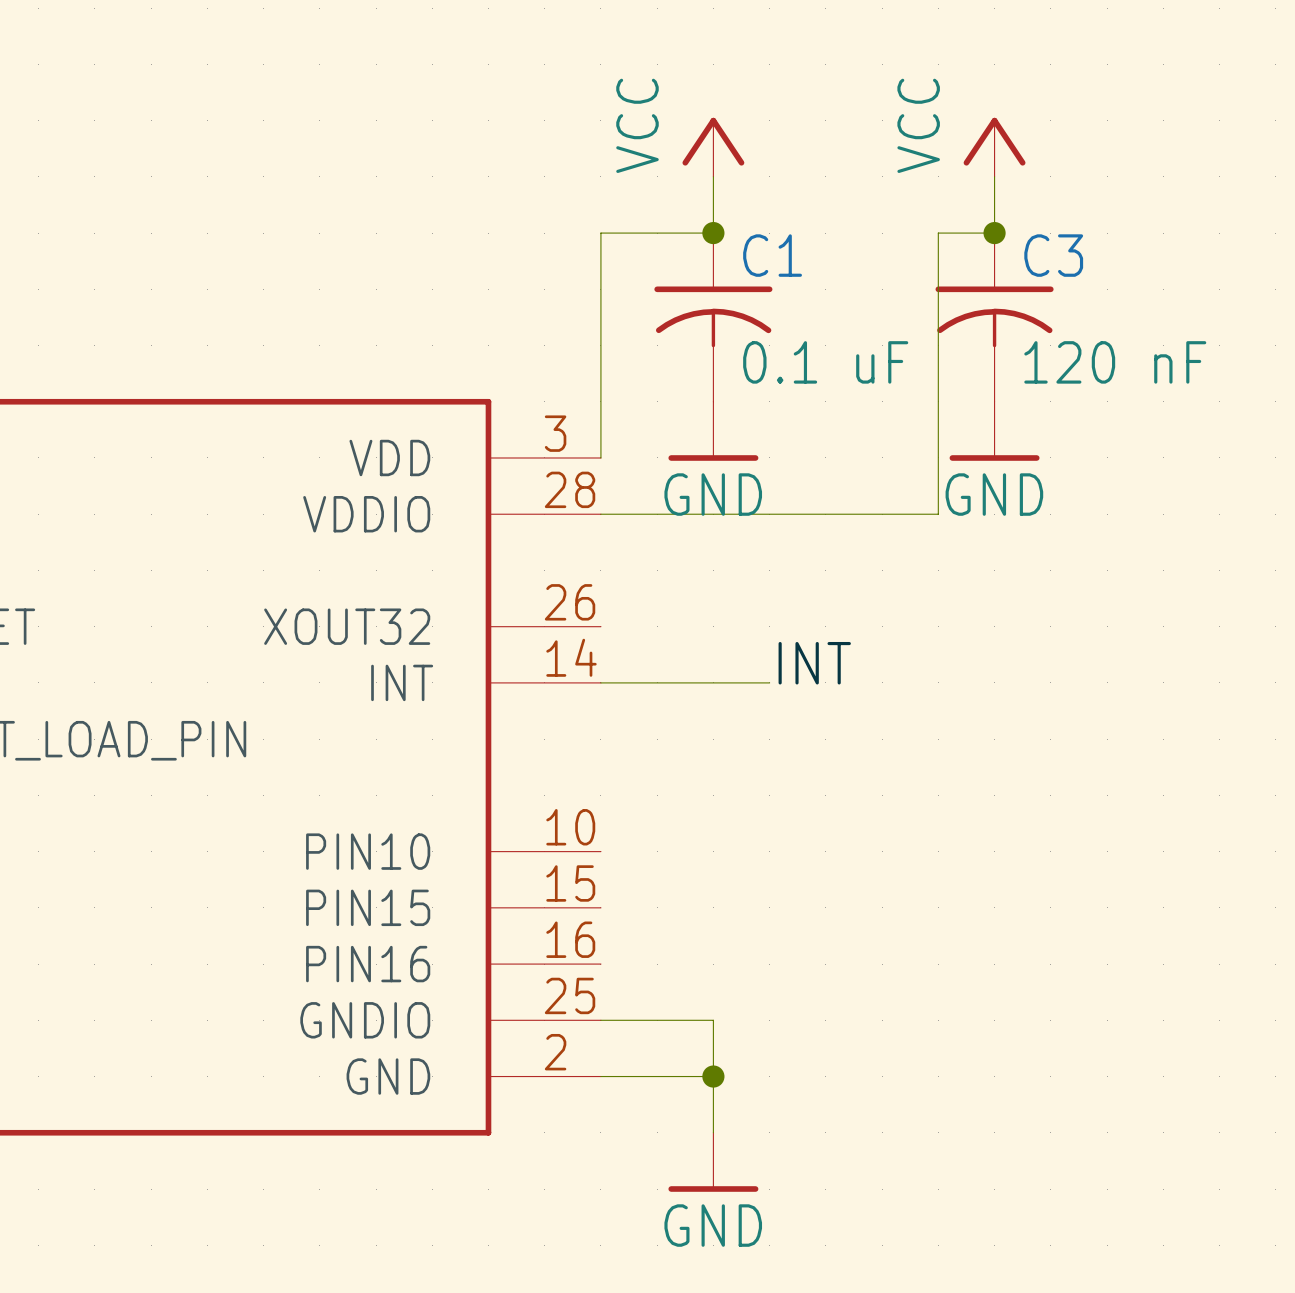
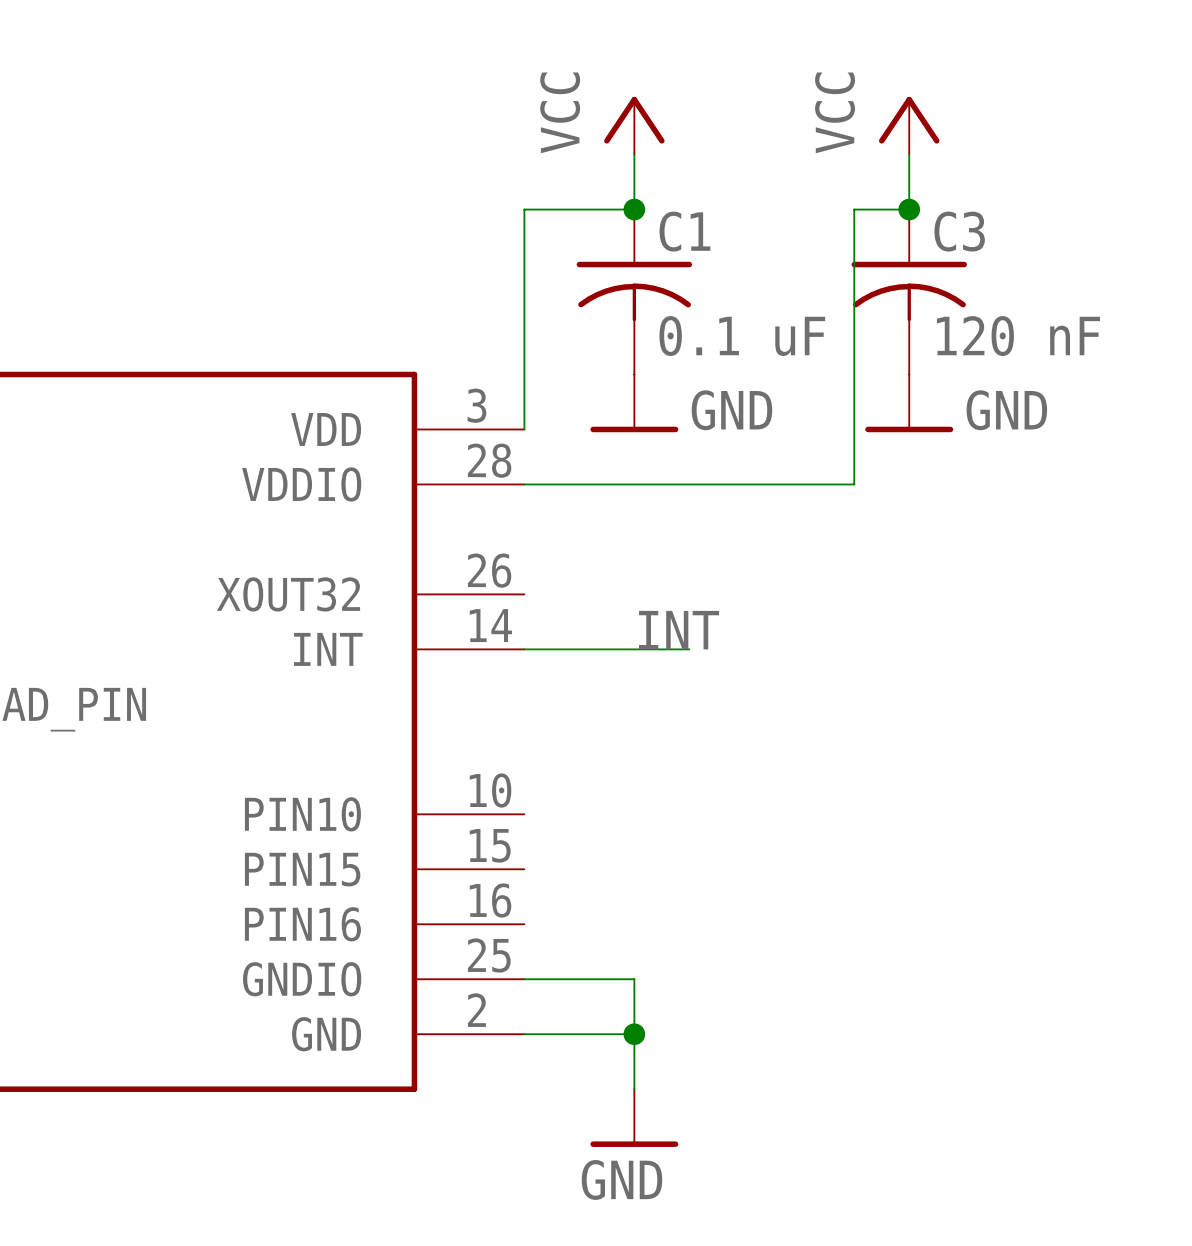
power symbol text position: GND (713, 494) -> GND (731, 410)
power symbol text position: GND (994, 494) -> GND (1006, 410)
label position: INT (814, 663) -> INT (679, 630)

